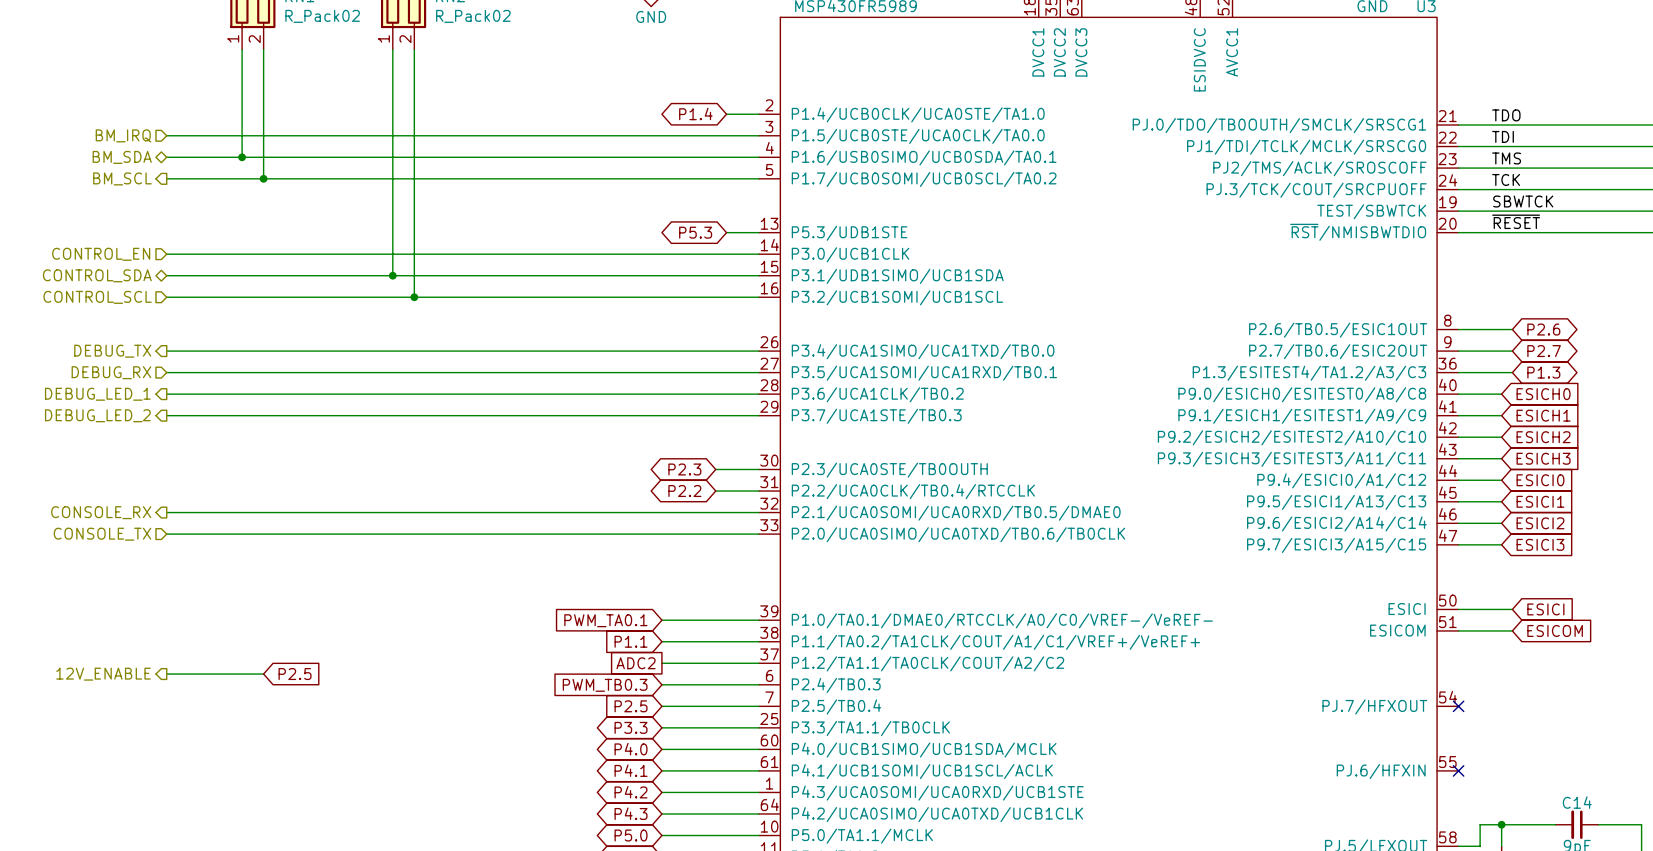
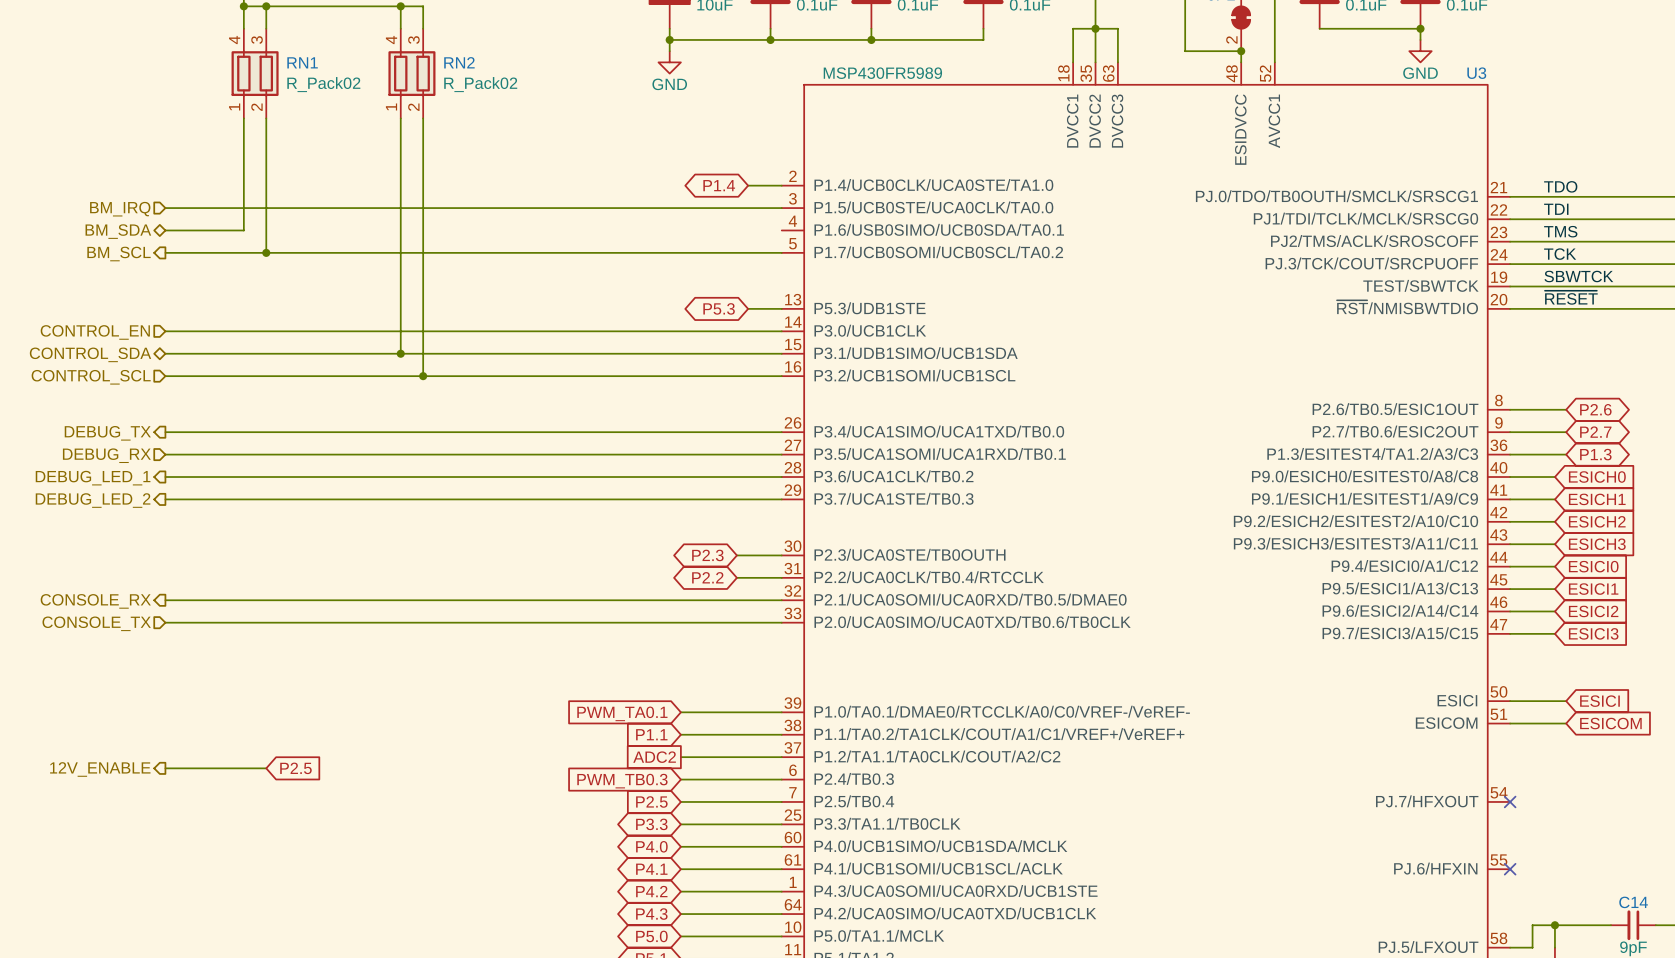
wire: (242, 157) (758, 157) -> none
junction: (242, 157) -> none

